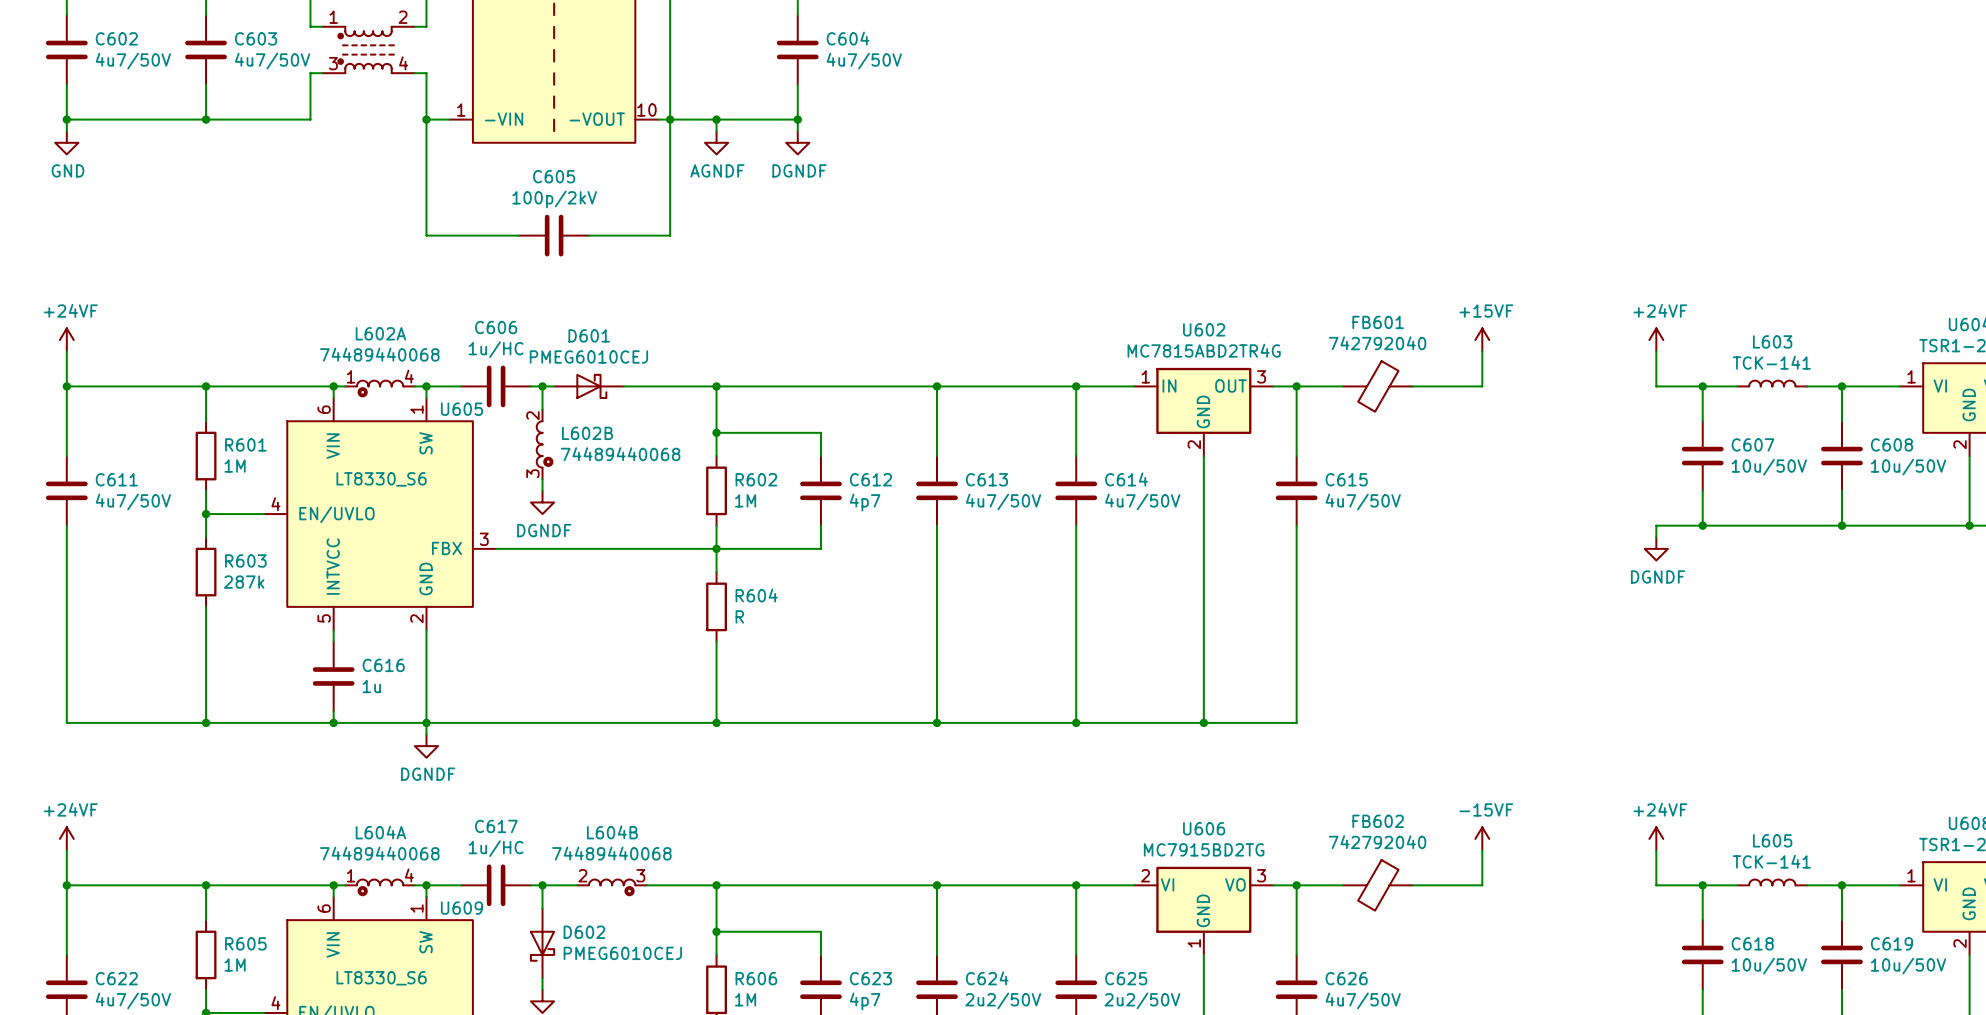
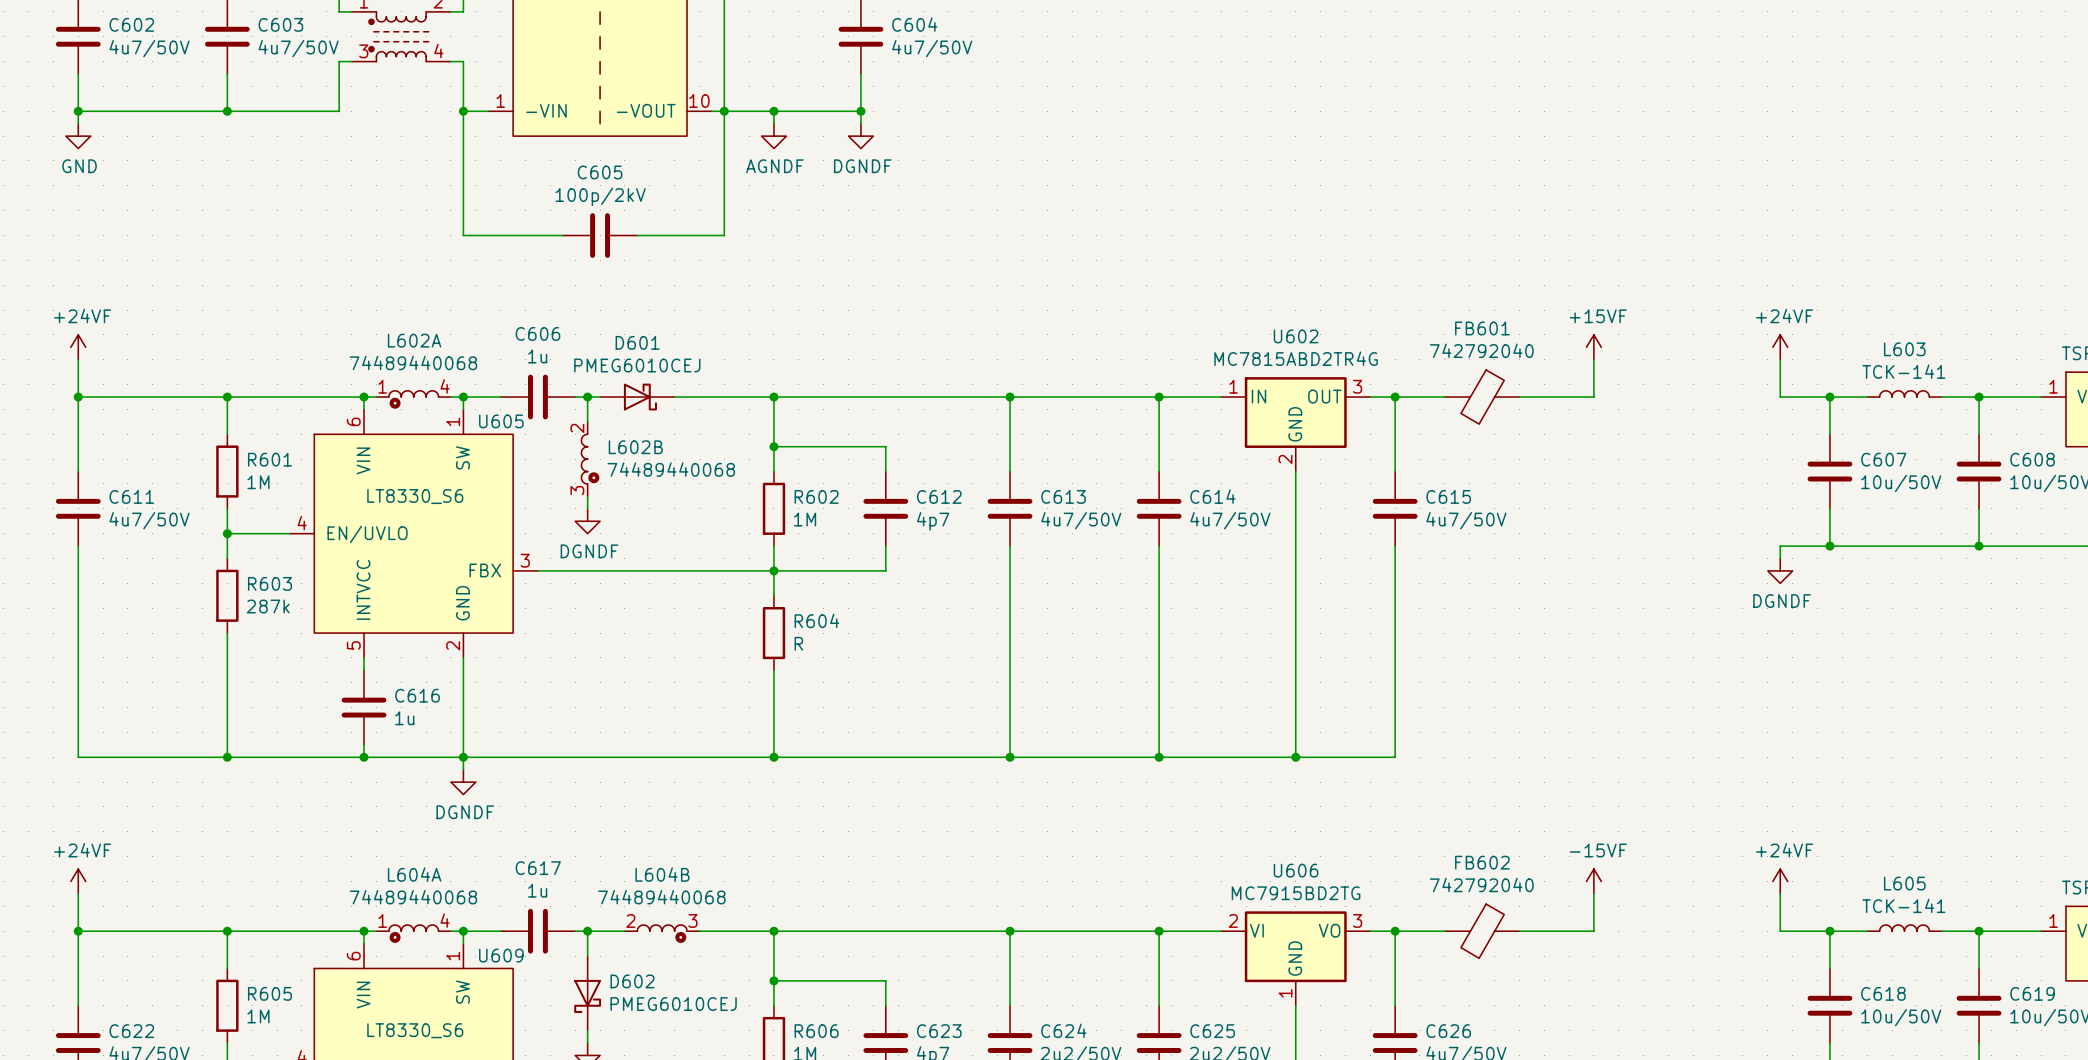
C606 value: 1u/HC (496, 349) -> 1u (537, 356)
C617 value: 1u/HC (496, 848) -> 1u (537, 890)

